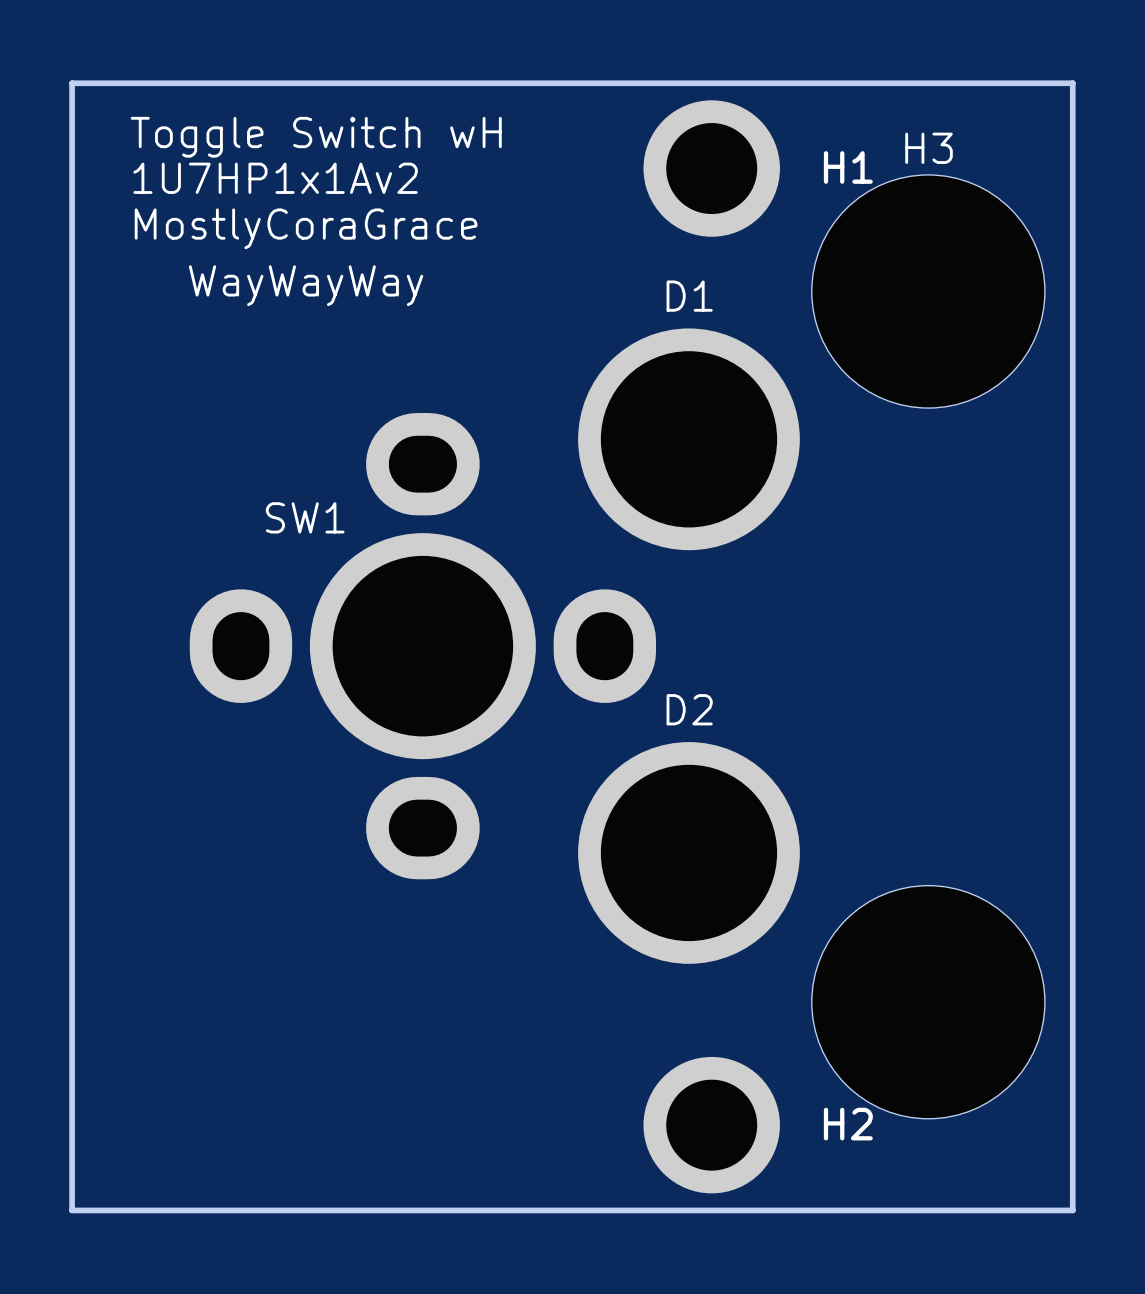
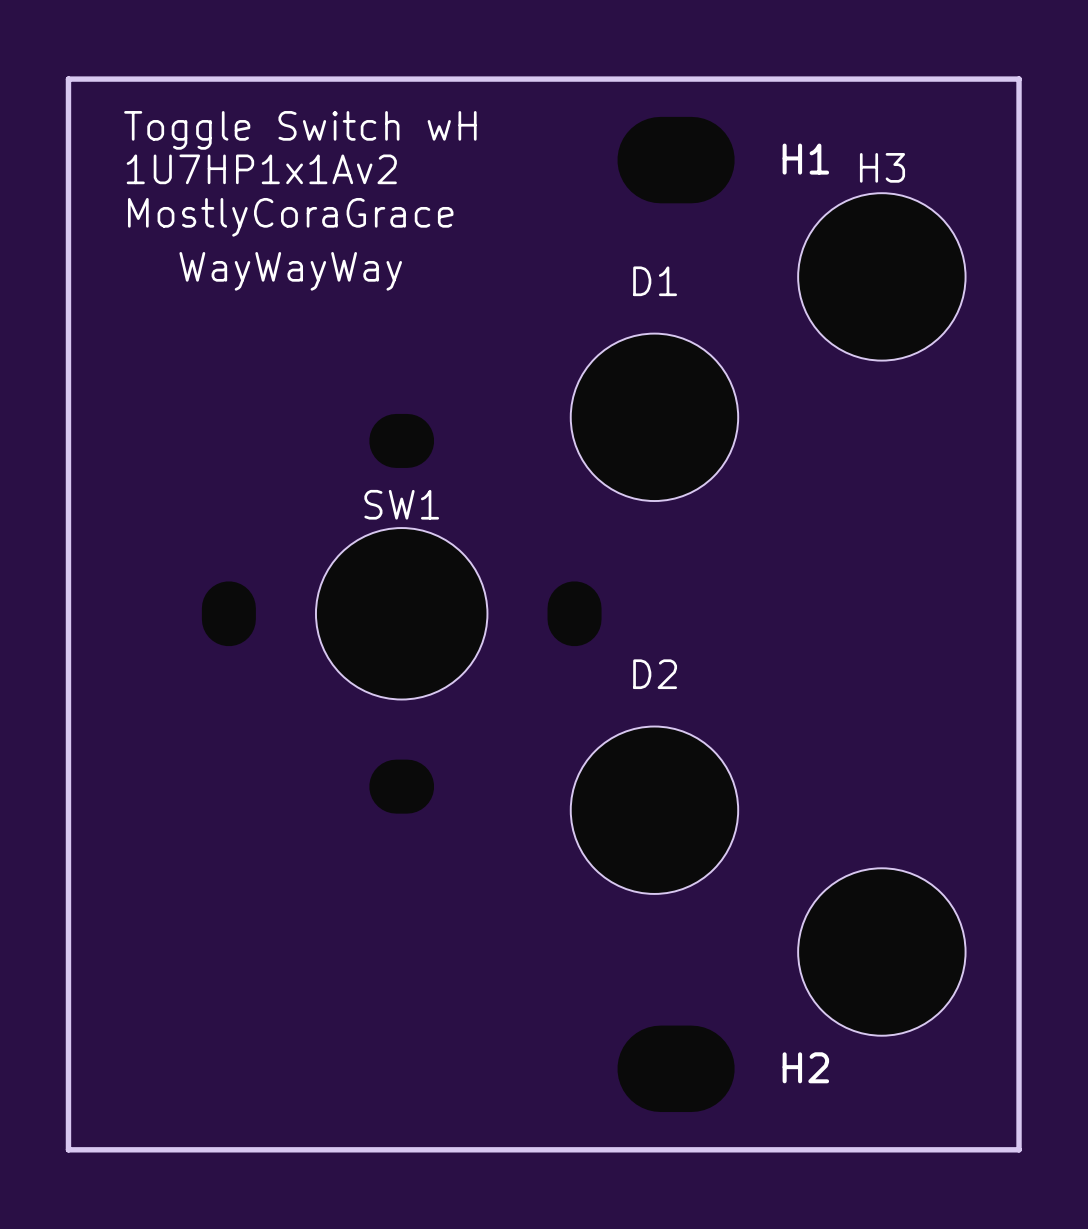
H1 footprint: [643, 100, 780, 237] -> [617, 116, 735, 204]
H3 footprint: [811, 174, 1045, 1119] -> [798, 193, 966, 1036]
D1 footprint: [578, 328, 800, 551] -> [570, 333, 739, 502]
SW1 footprint: [189, 413, 657, 880] -> [201, 413, 602, 814]
SW1 name position: SW1 (305, 517) -> SW1 (401, 504)
D2 footprint: [578, 742, 800, 964] -> [570, 726, 739, 894]
H2 footprint: [643, 1056, 780, 1194] -> [617, 1025, 735, 1113]

